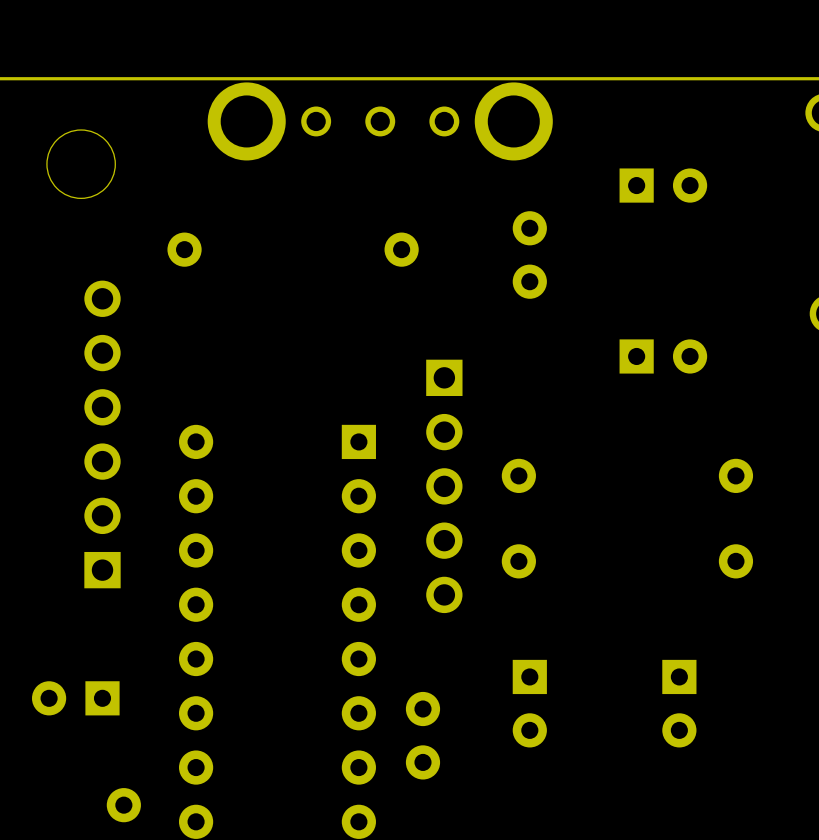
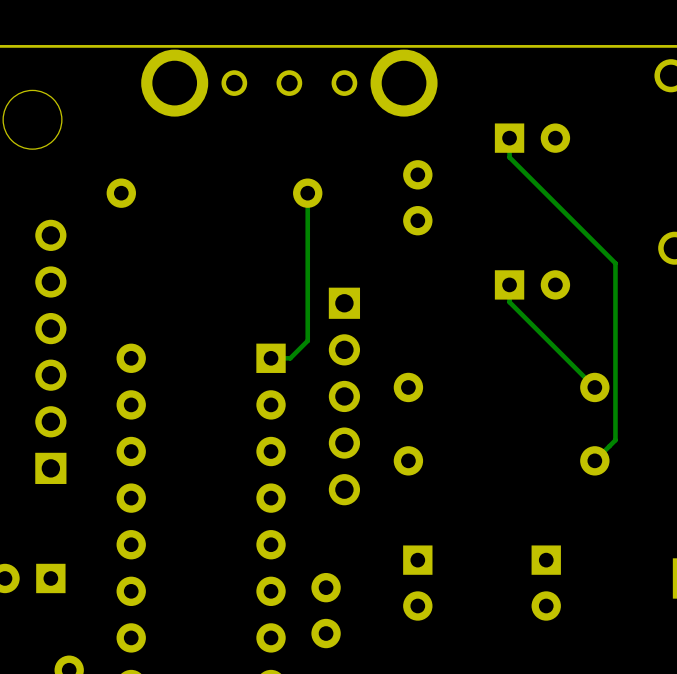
track: none -> (509, 138) (509, 157) (615, 263) (615, 440) (594, 460)
track: none -> (307, 193) (307, 340) (290, 358) (271, 358)
track: none -> (509, 284) (509, 302) (594, 387)

